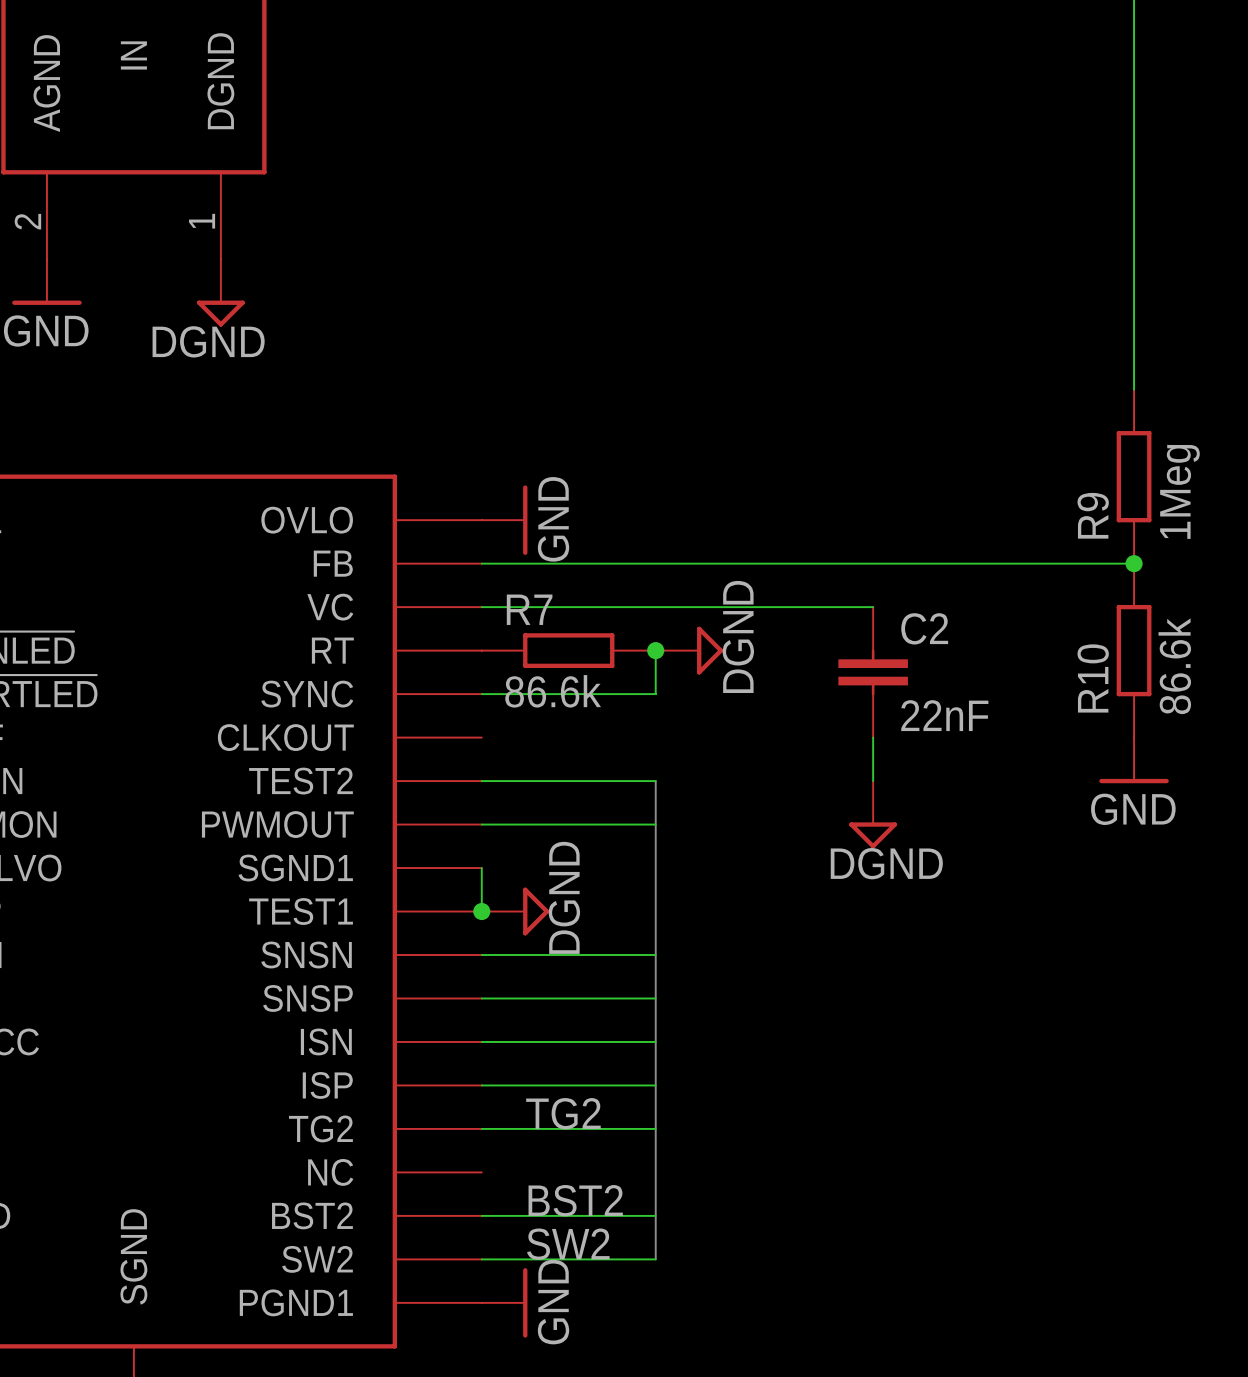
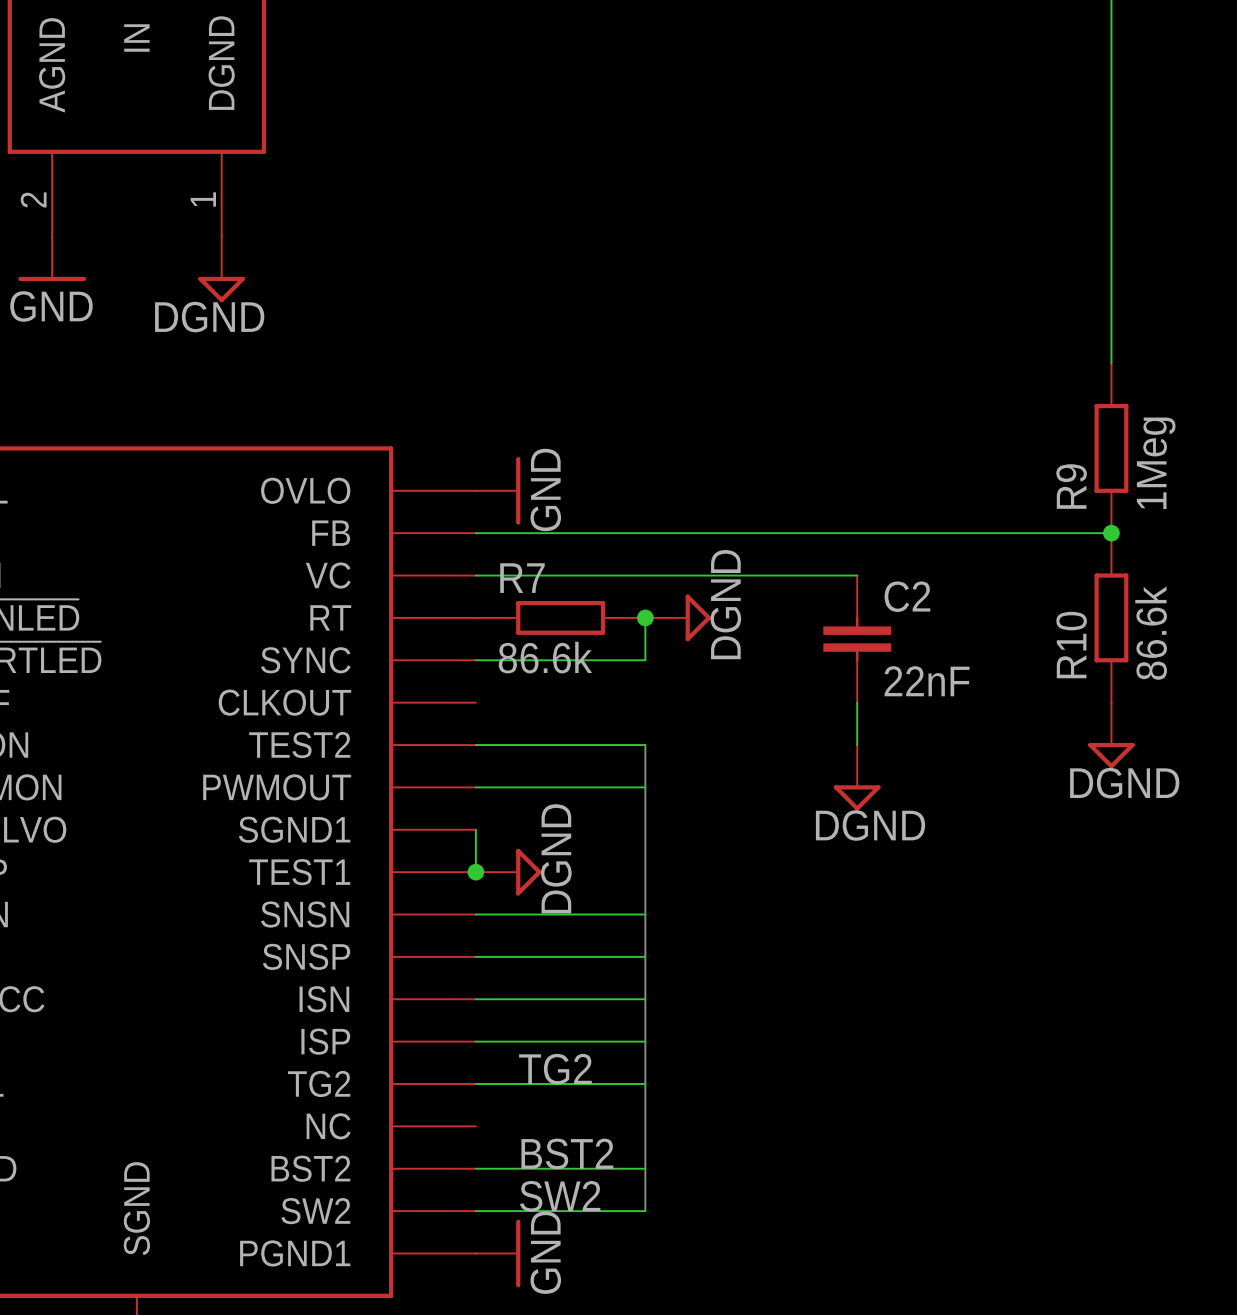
power symbol: GND (1134, 760) -> DGND (1111, 735)

